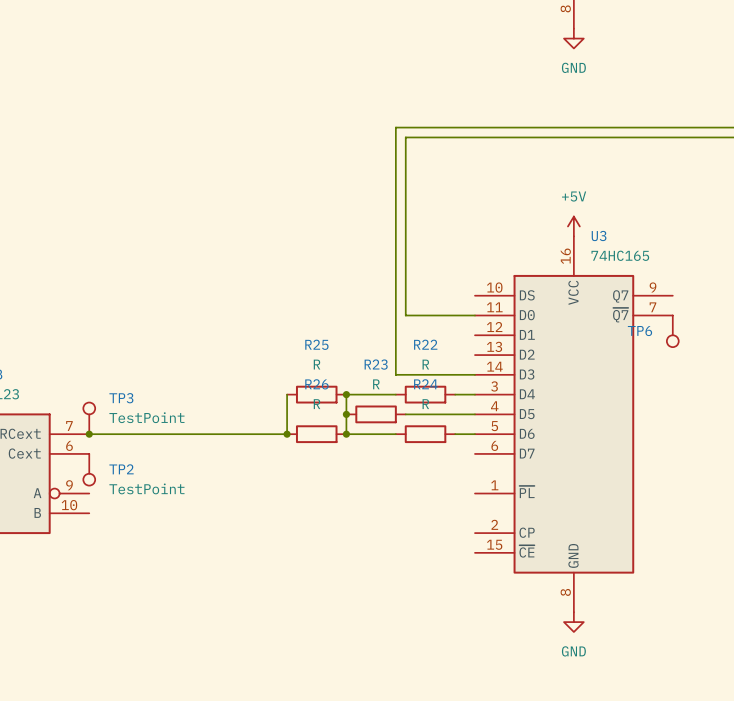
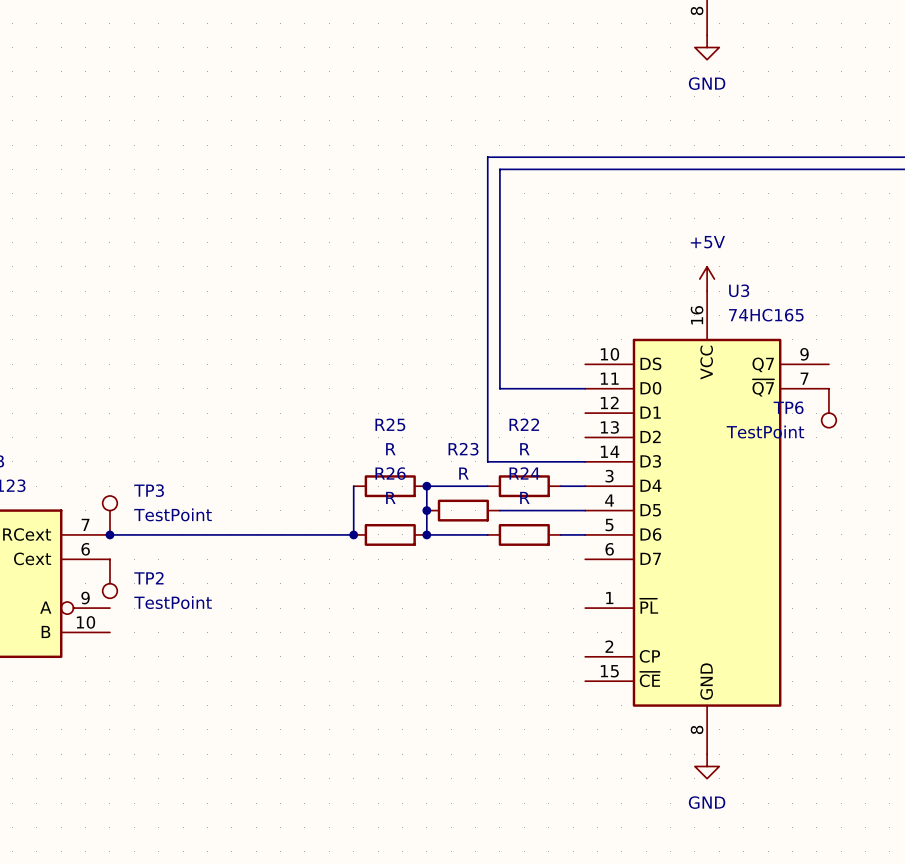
TP6 value: none -> TestPoint (765, 432)

